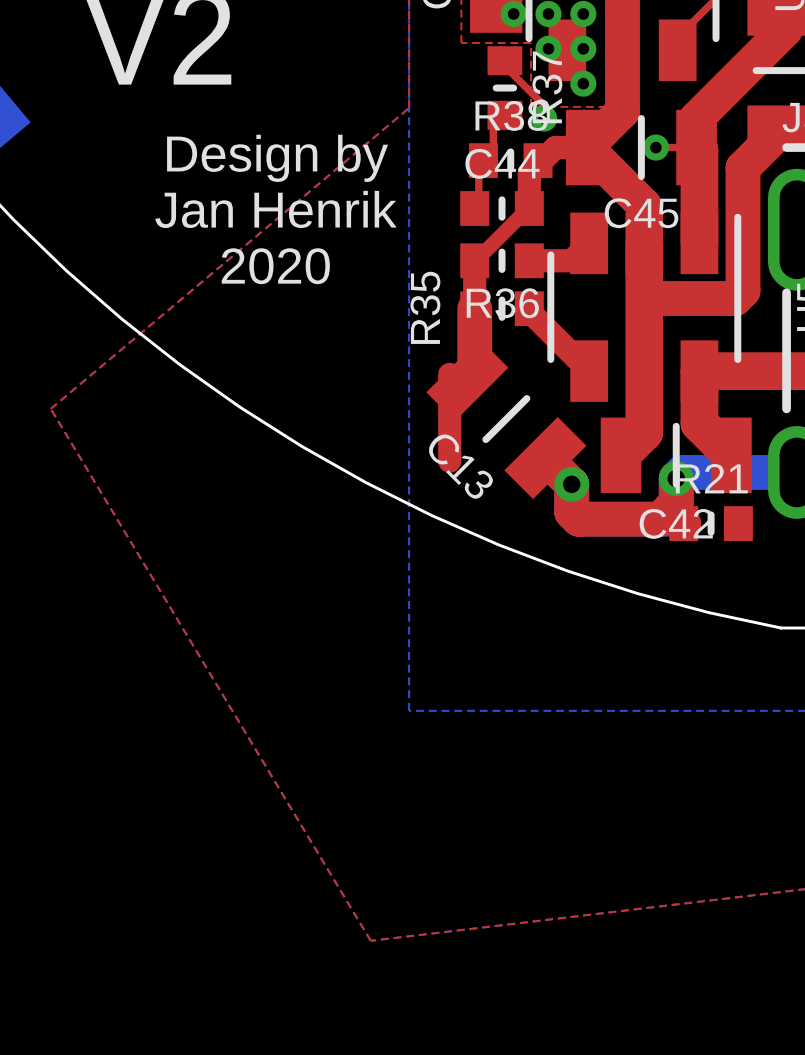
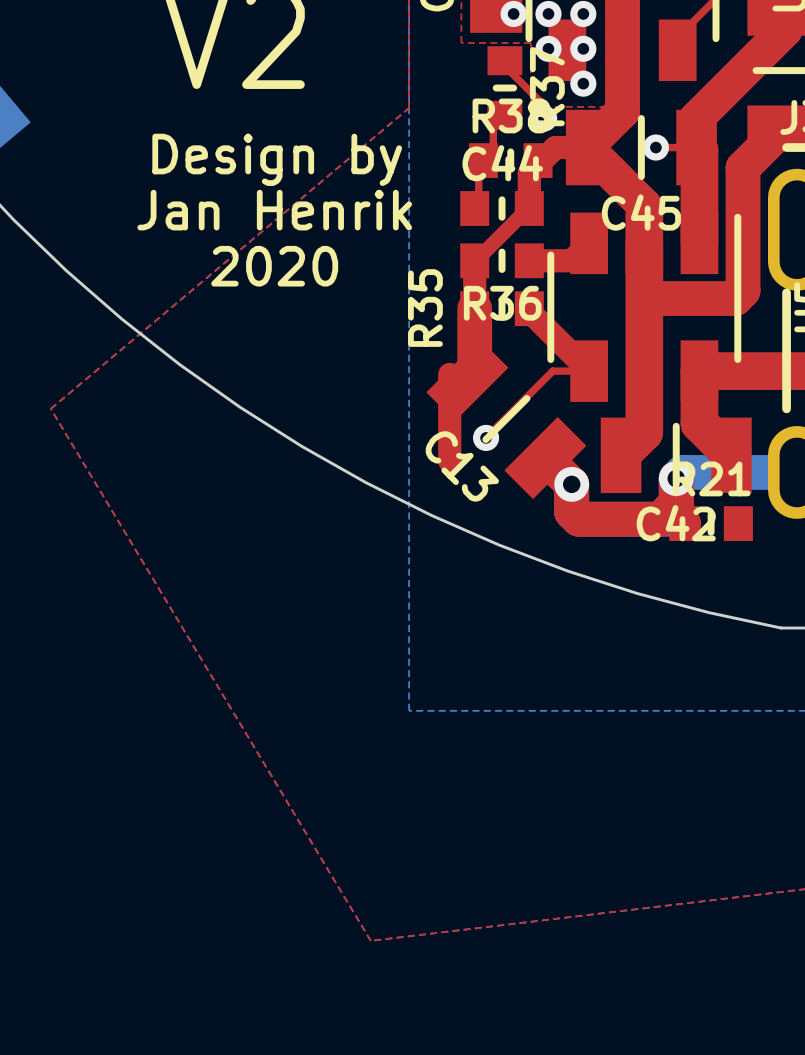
top track: none -> (589, 371) (552, 371) (486, 437)
via: none -> (486, 437)

